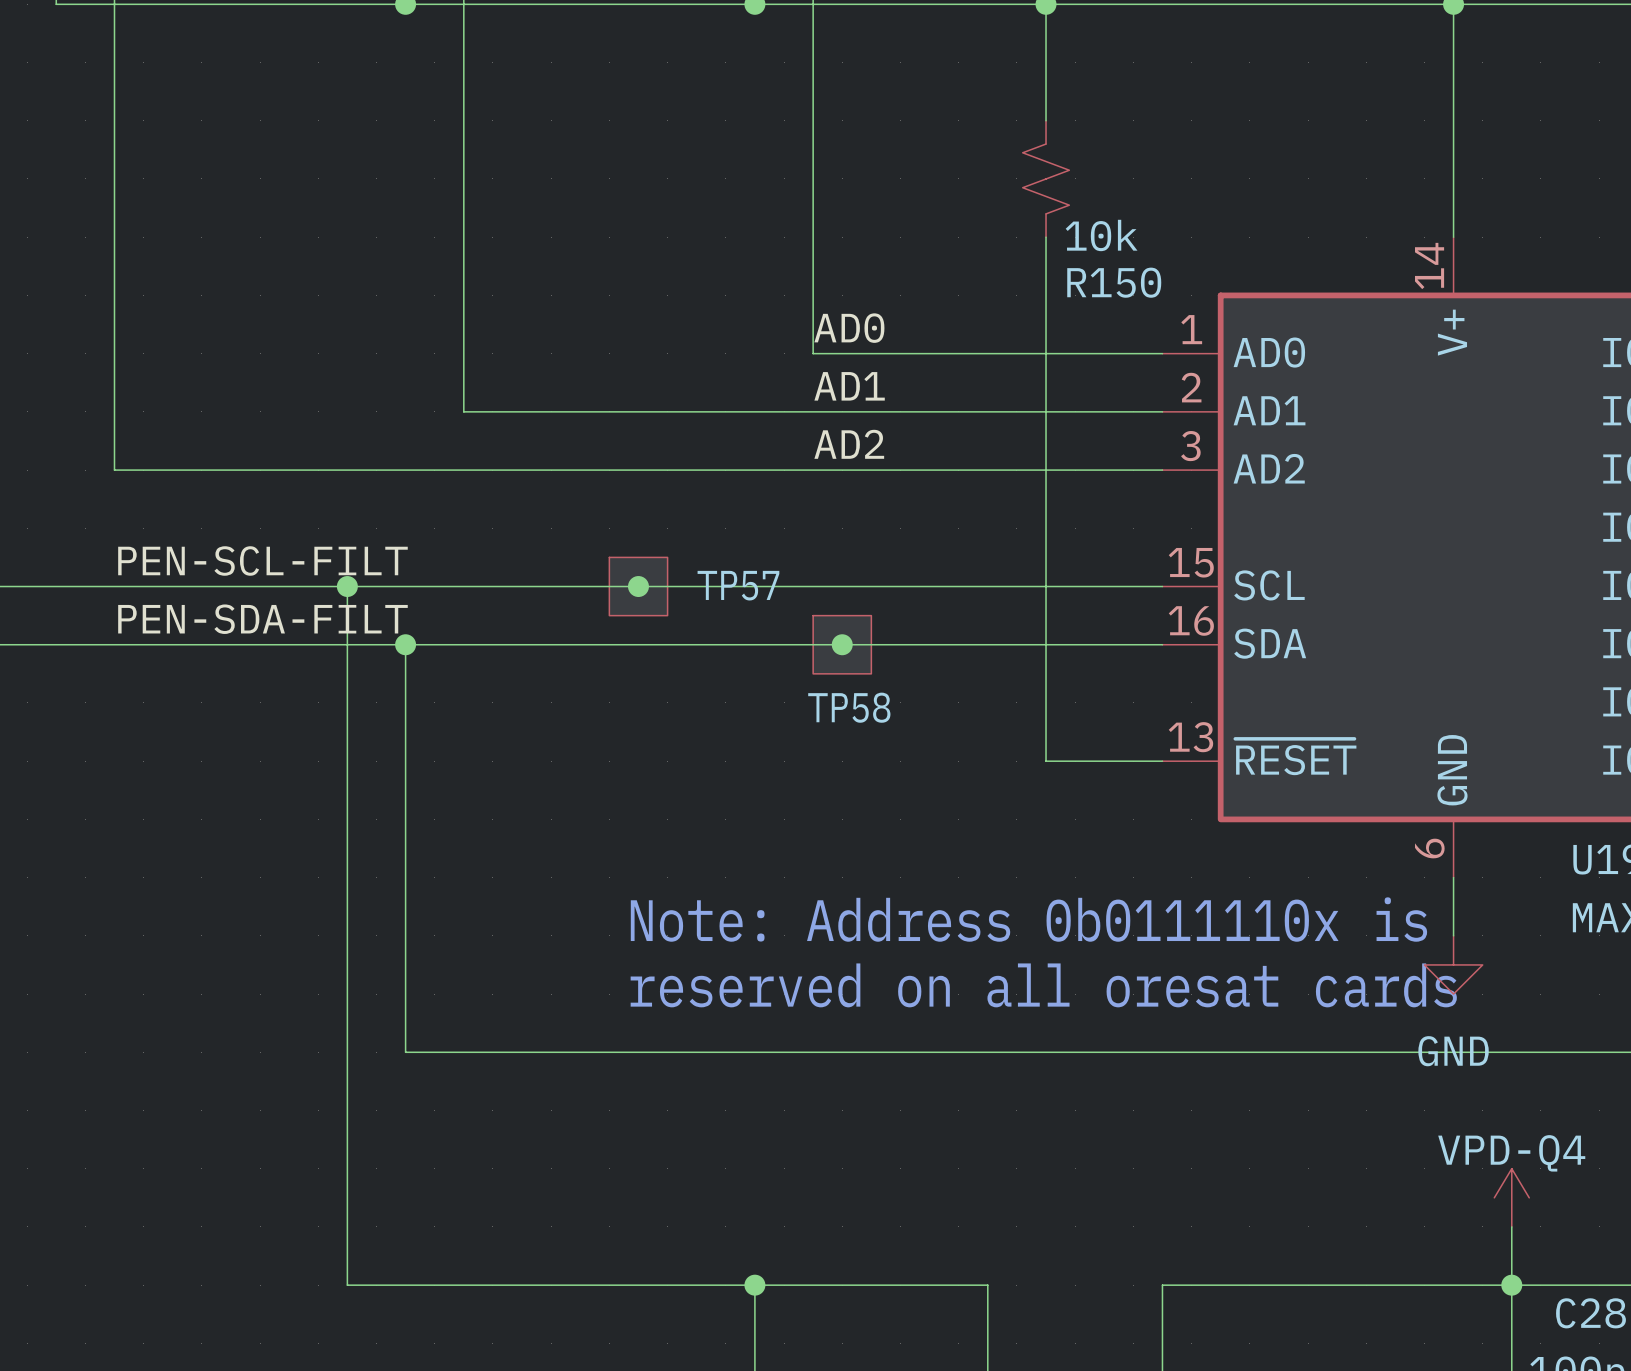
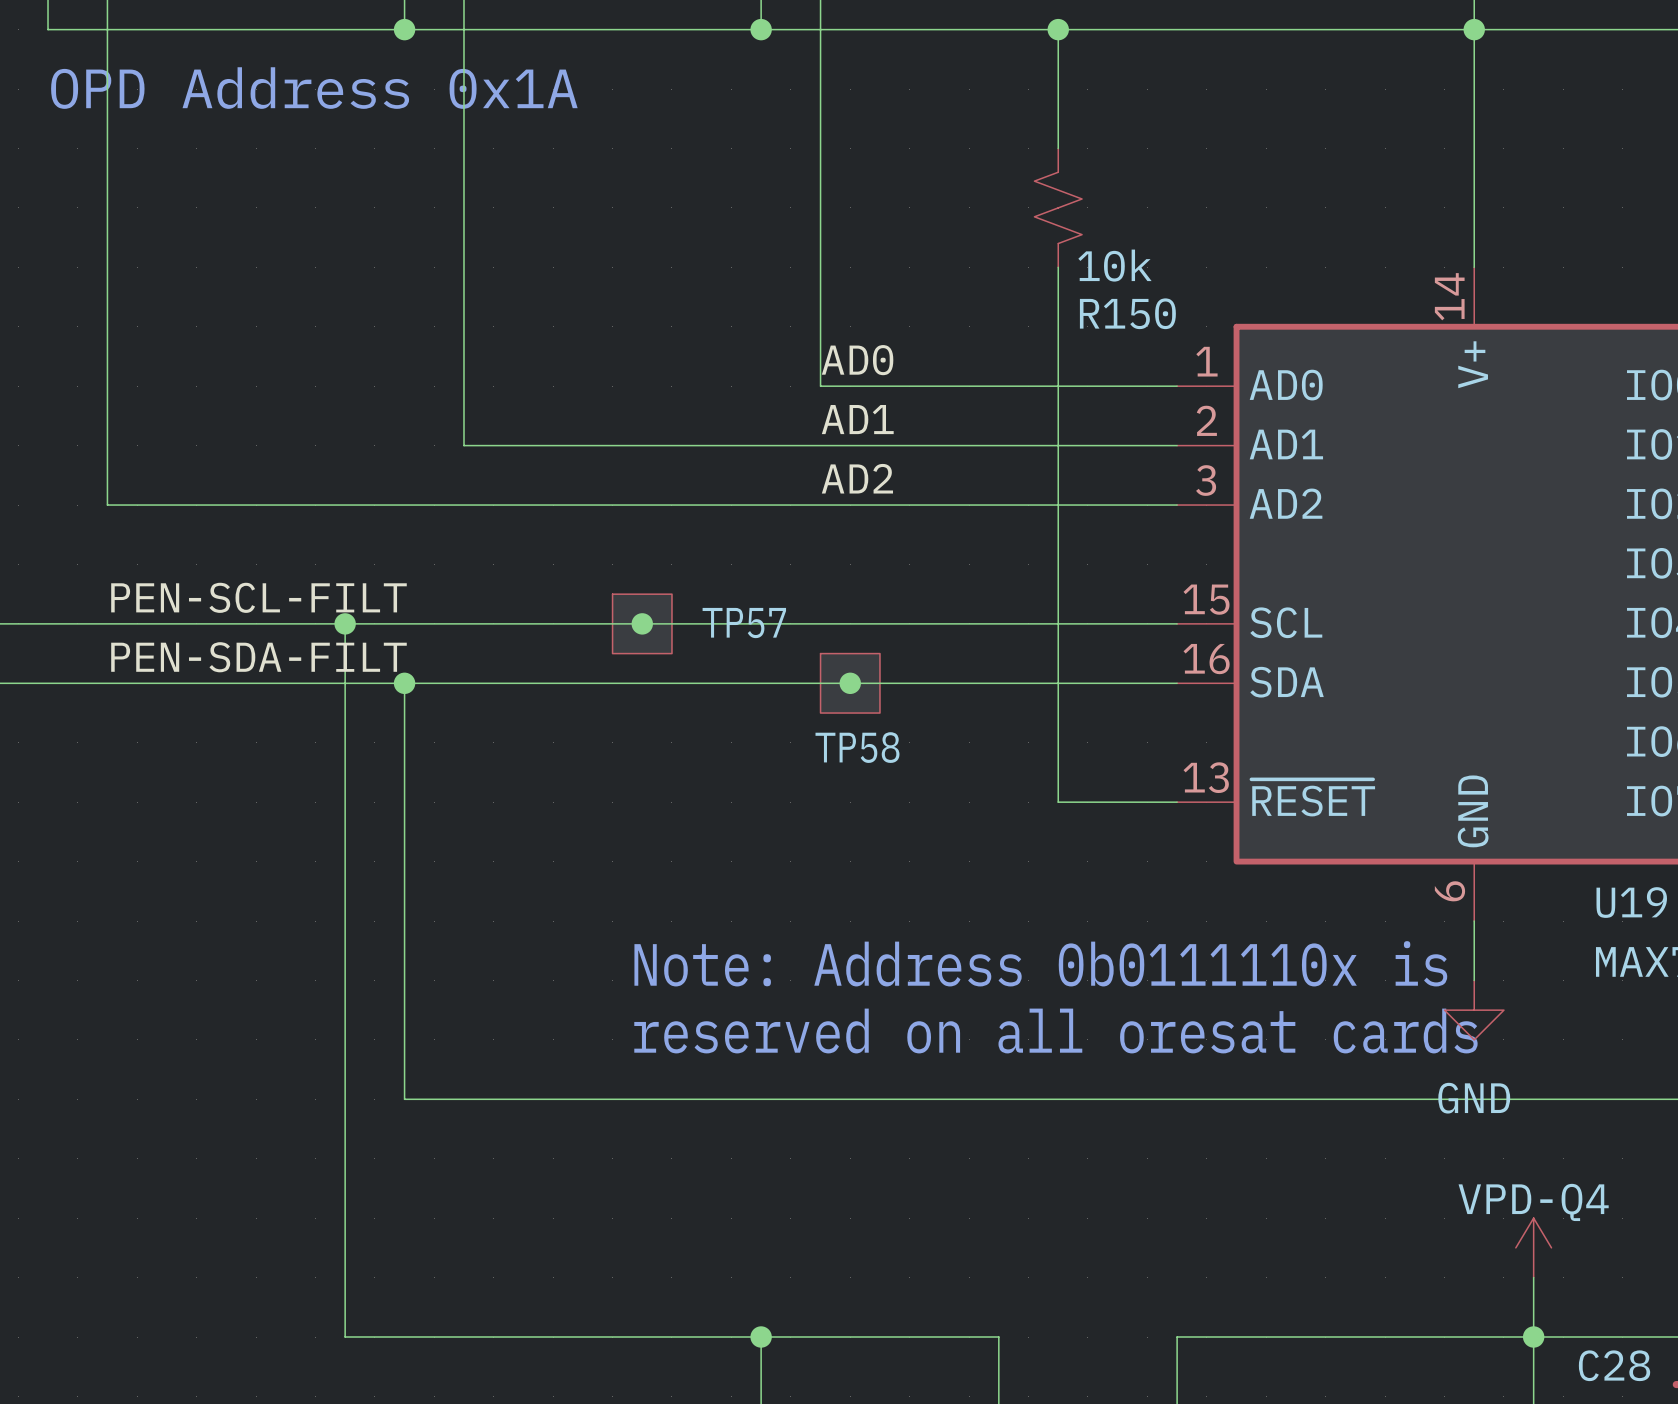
text: none -> OPD Address 0x1A (314, 88)

